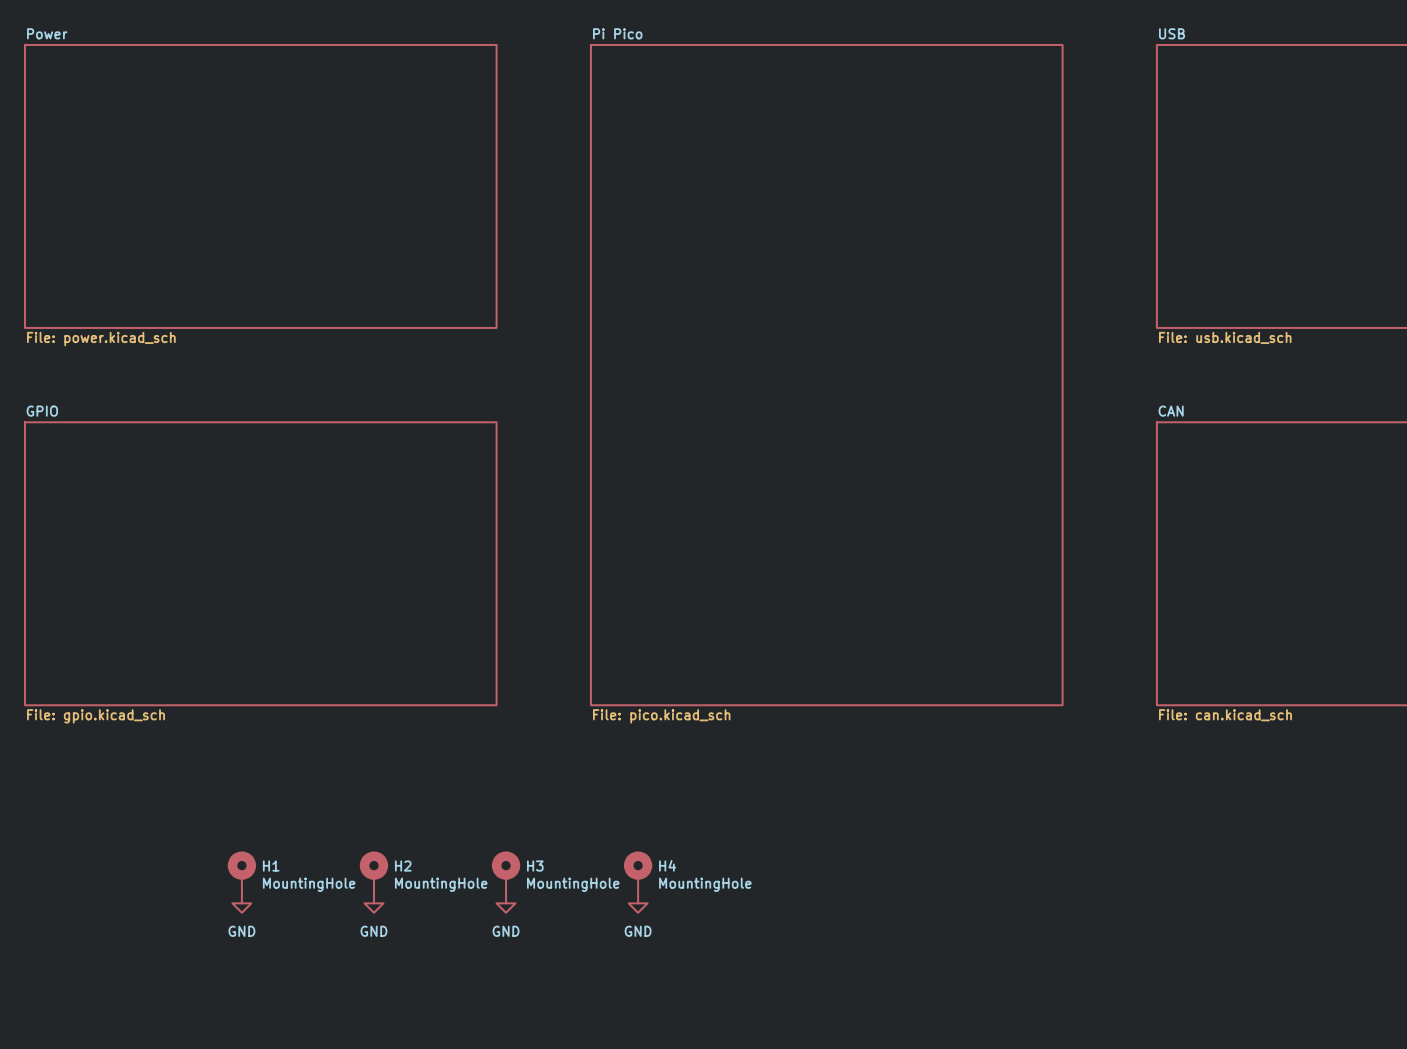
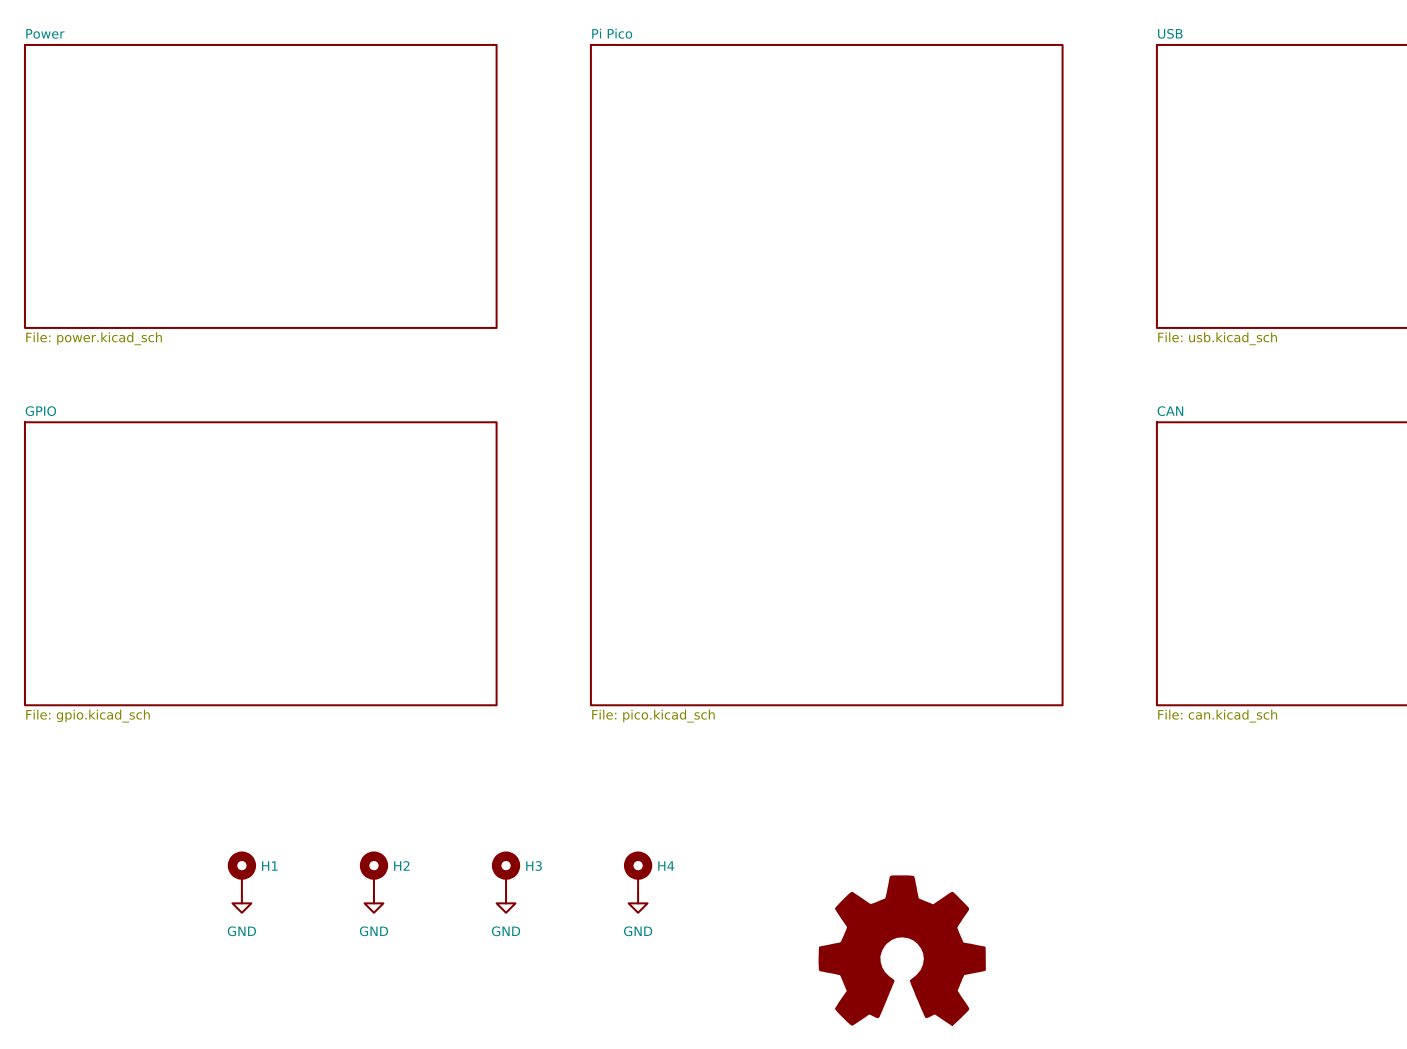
H1 value: MountingHole (309, 884) -> none
H2 value: MountingHole (441, 884) -> none
H3 value: MountingHole (573, 884) -> none
H4 value: MountingHole (705, 884) -> none
power symbol: none -> (902, 950)

